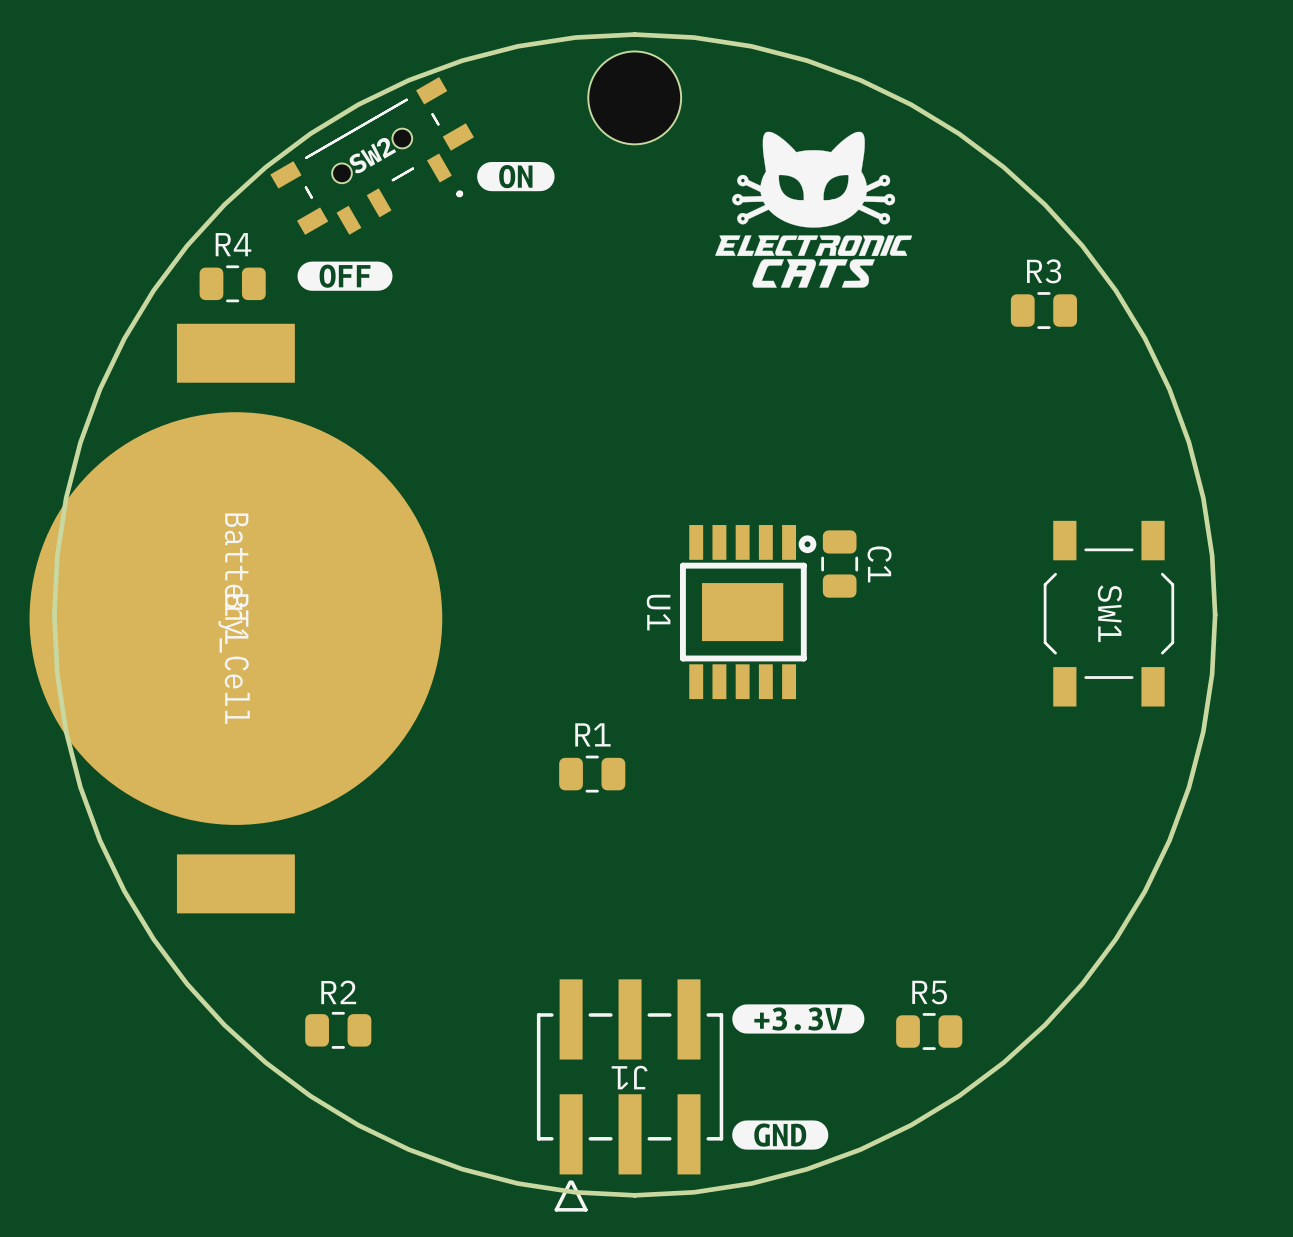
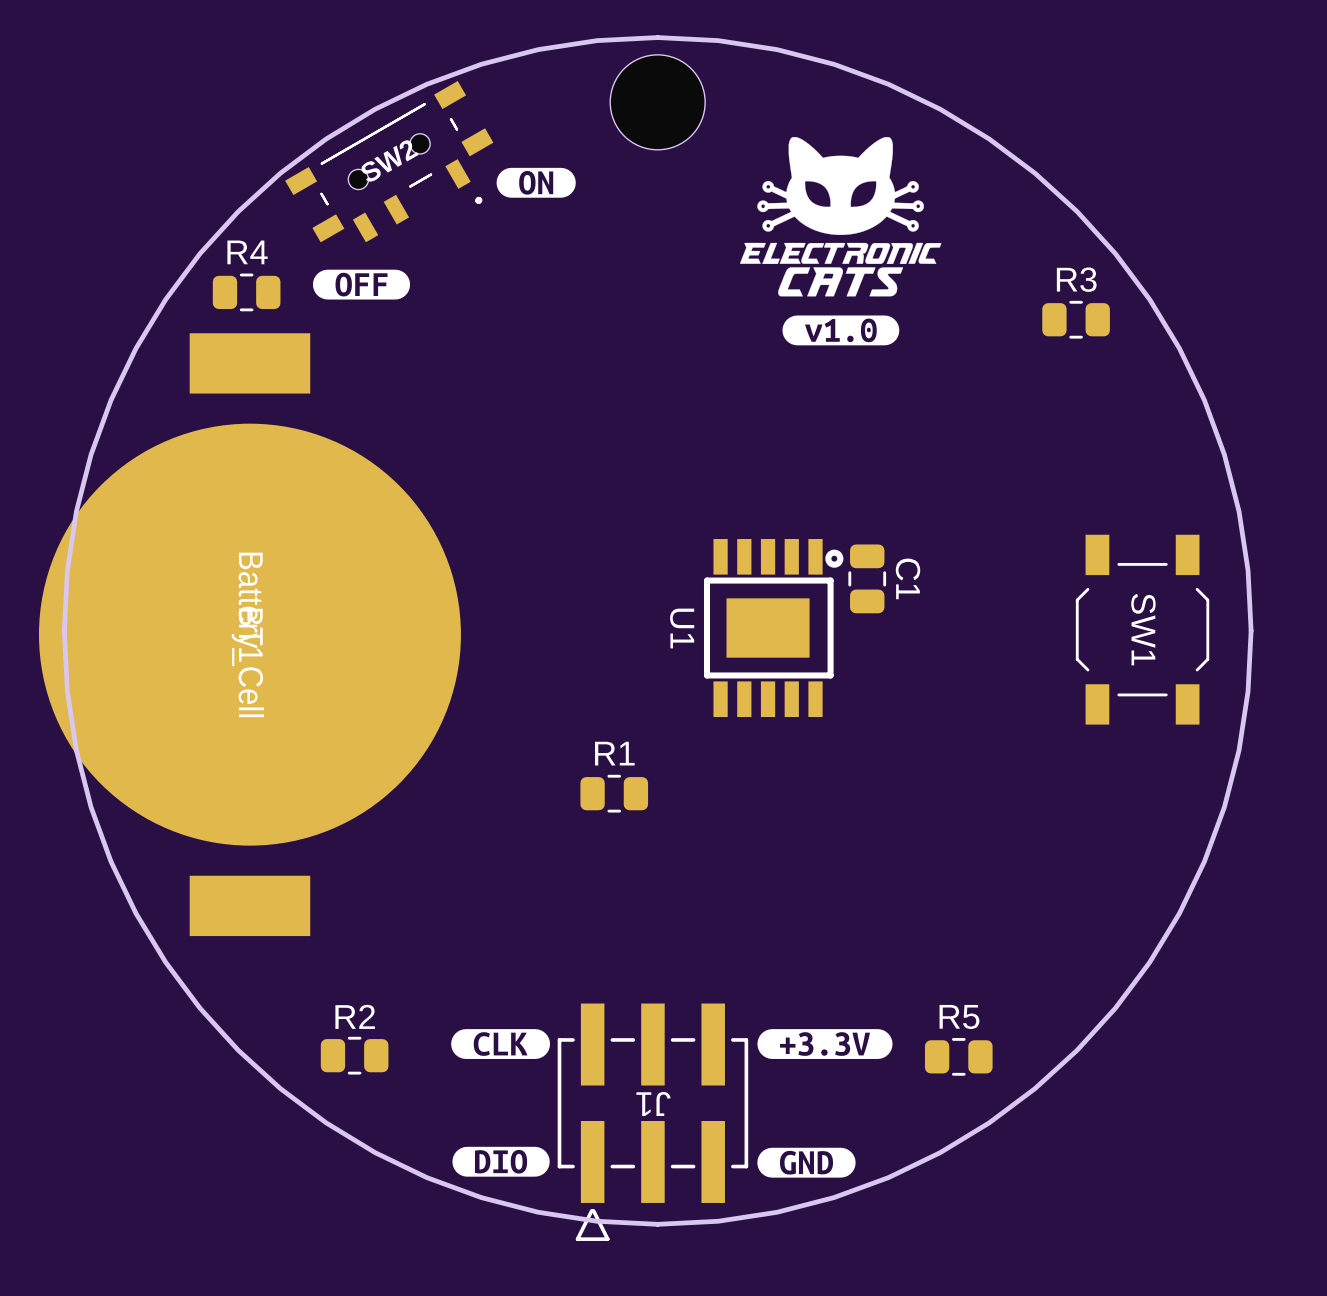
drawing: none -> [782, 315, 900, 346]
drawing: none -> [451, 1029, 551, 1059]
drawing: none -> [452, 1146, 550, 1177]

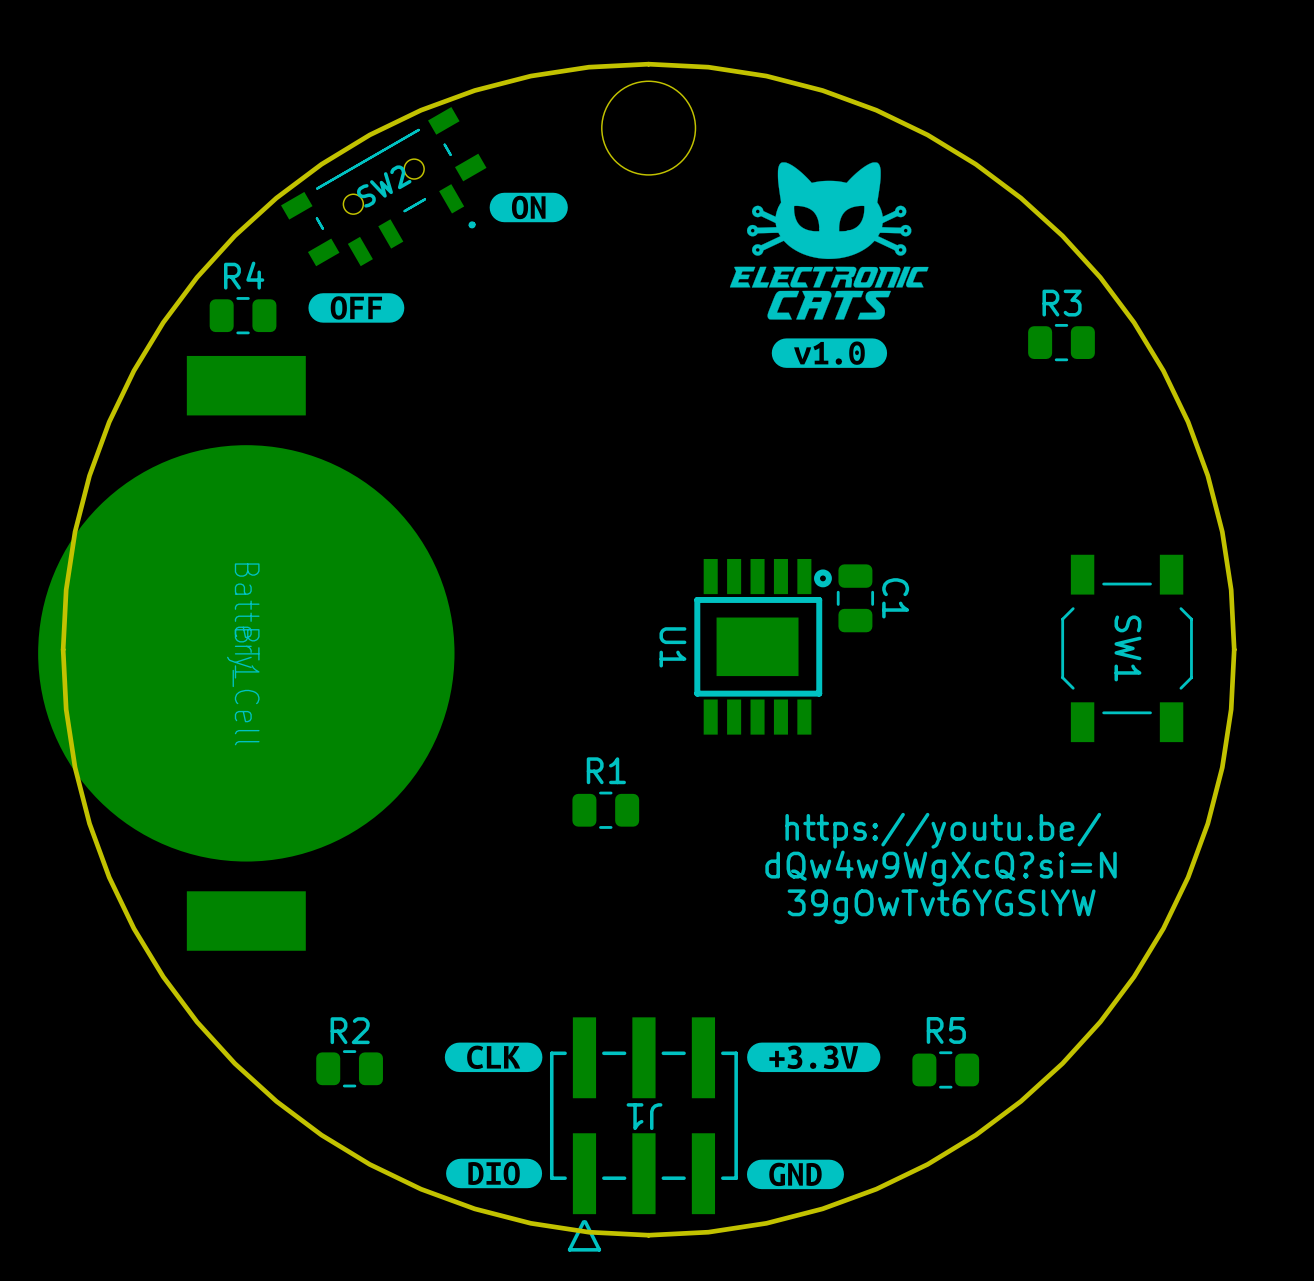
text: none -> https://youtu.be/ (943, 830)
text: none -> dQw4w9WgXcQ?si=N (941, 868)
text: none -> 39gOwTvt6YGSlYW (941, 906)

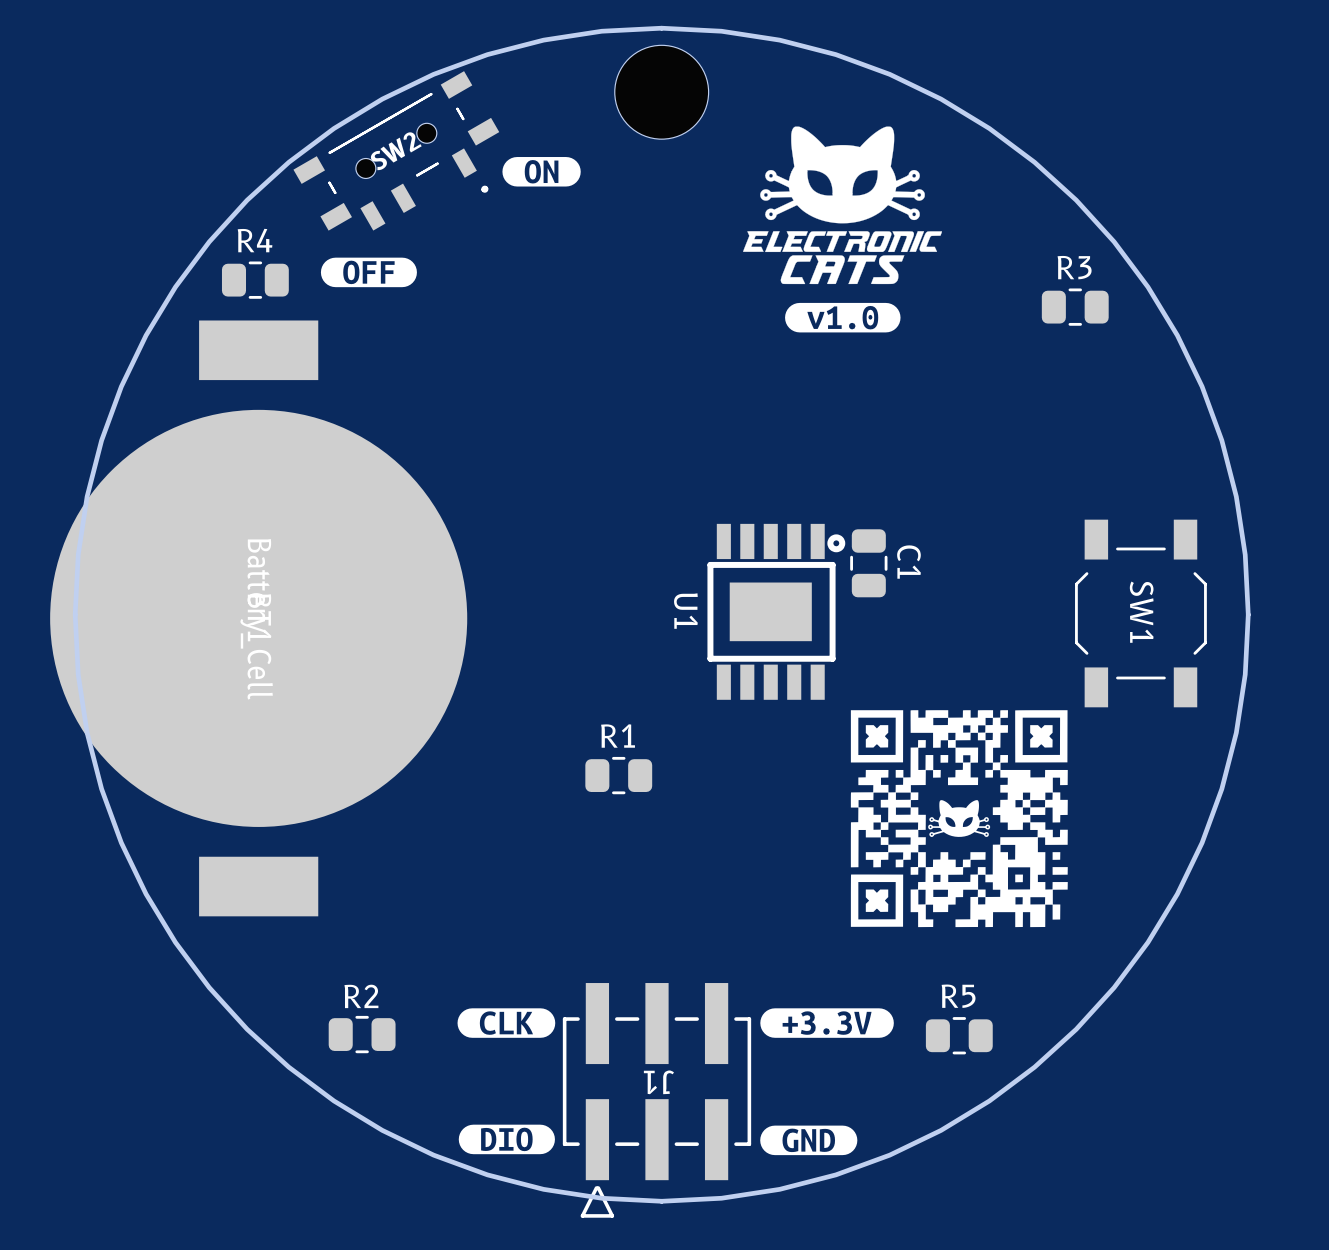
drawing: none -> [850, 710, 1068, 928]
text: https://youtu.be/ (943, 830) -> none
text: dQw4w9WgXcQ?si=N (941, 868) -> none
text: 39gOwTvt6YGSlYW (941, 906) -> none

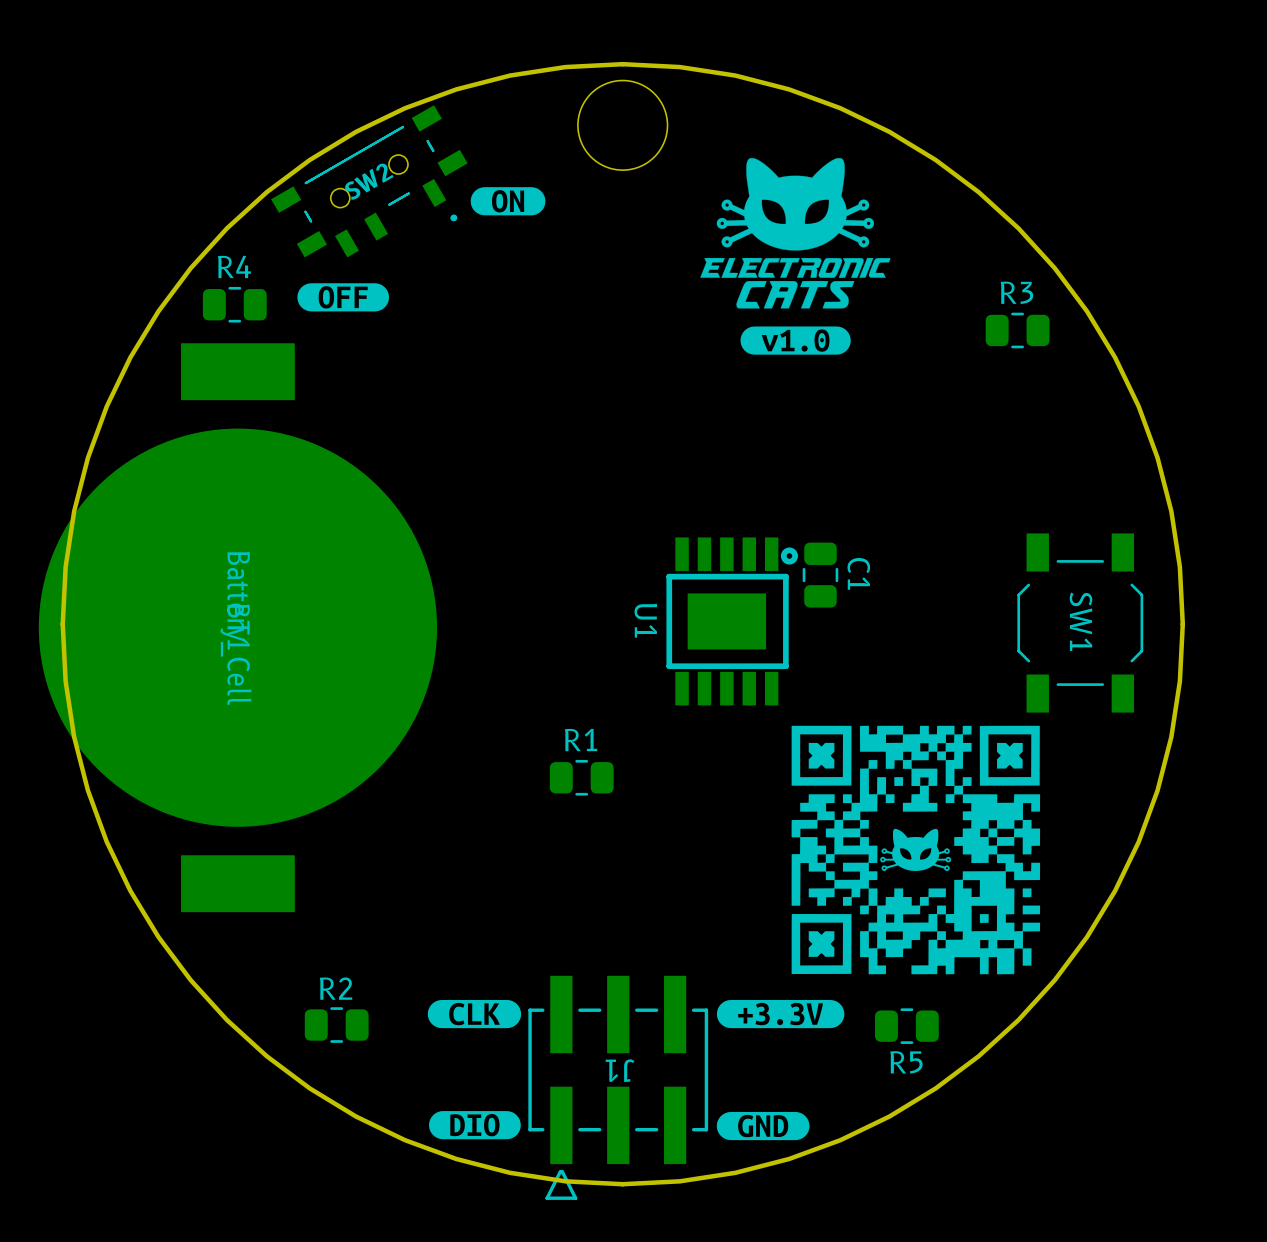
drawing: [850, 710, 1068, 928] -> none
drawing: none -> [791, 725, 1041, 975]
R5 name position: R5 (958, 996) -> R5 (906, 1062)

